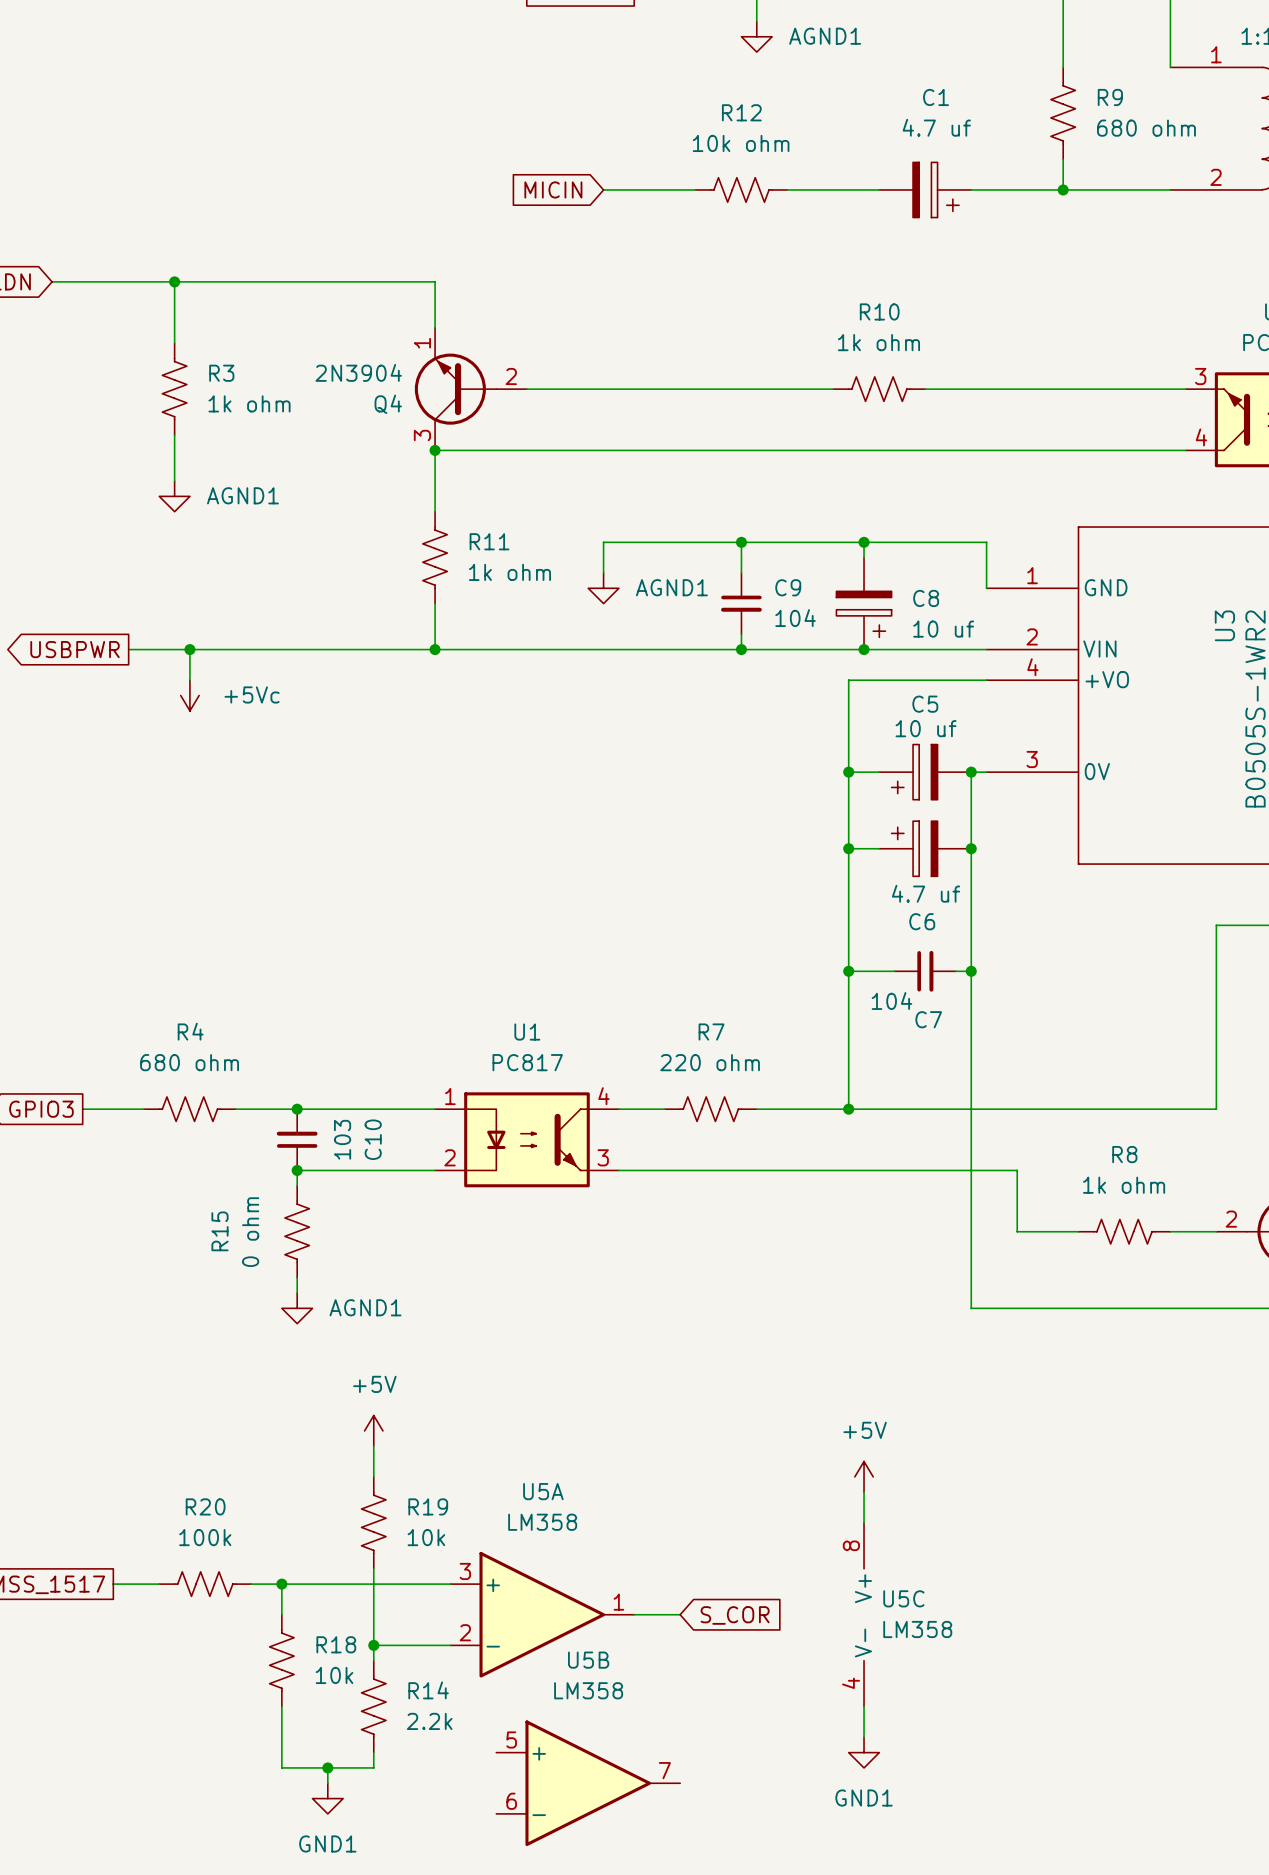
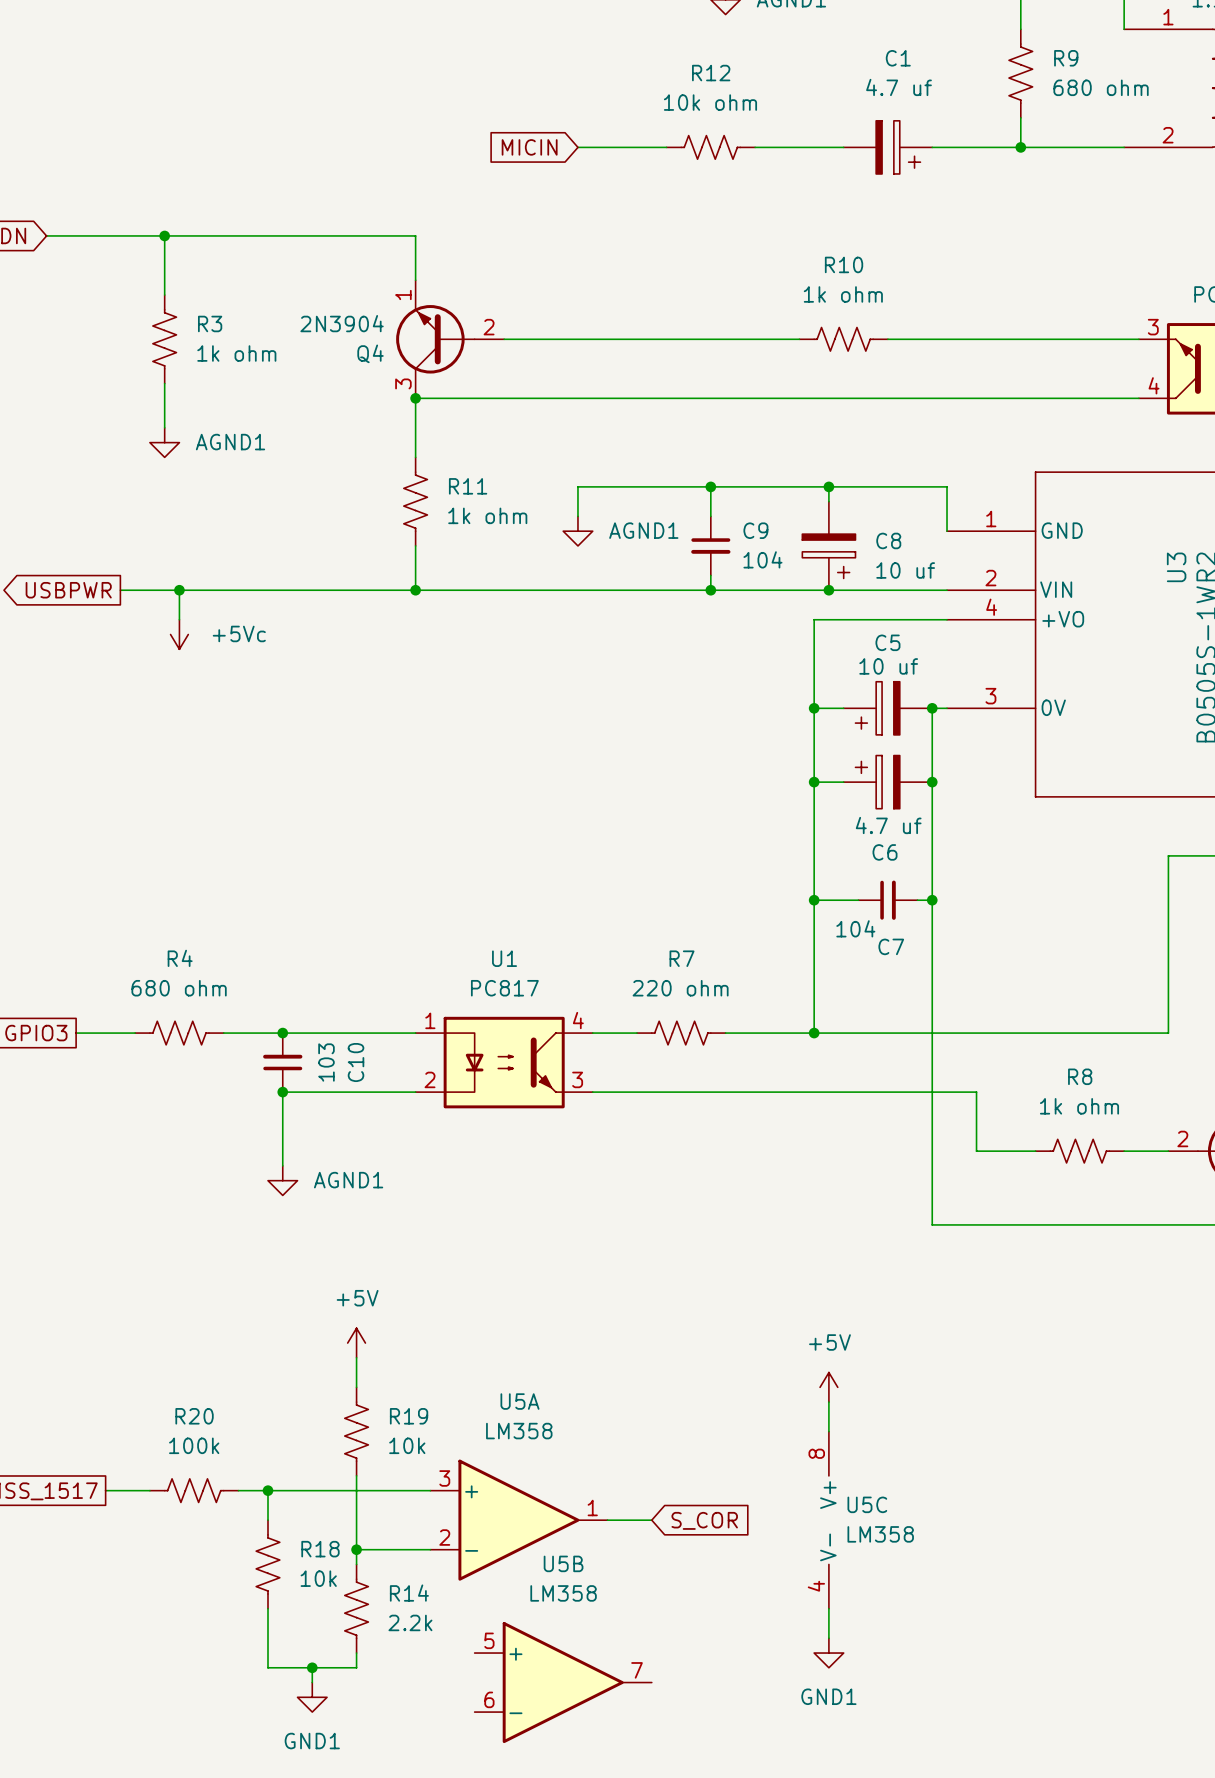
wire: none -> (282, 1106) (282, 1165)
R15: 0 ohm (297, 1231) -> none
wire: (297, 1277) (297, 1293) -> none
power symbol position: AGND1 (297, 1308) -> AGND1 (282, 1180)

